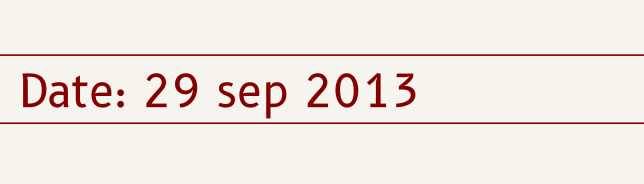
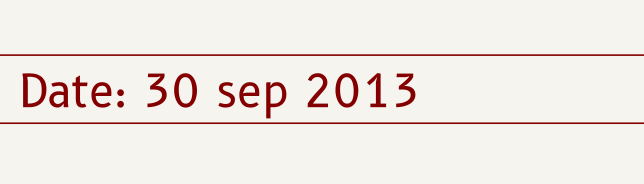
title block: Date: 29 sep 2013 (218, 95) -> Date: 30 sep 2013 (218, 95)

